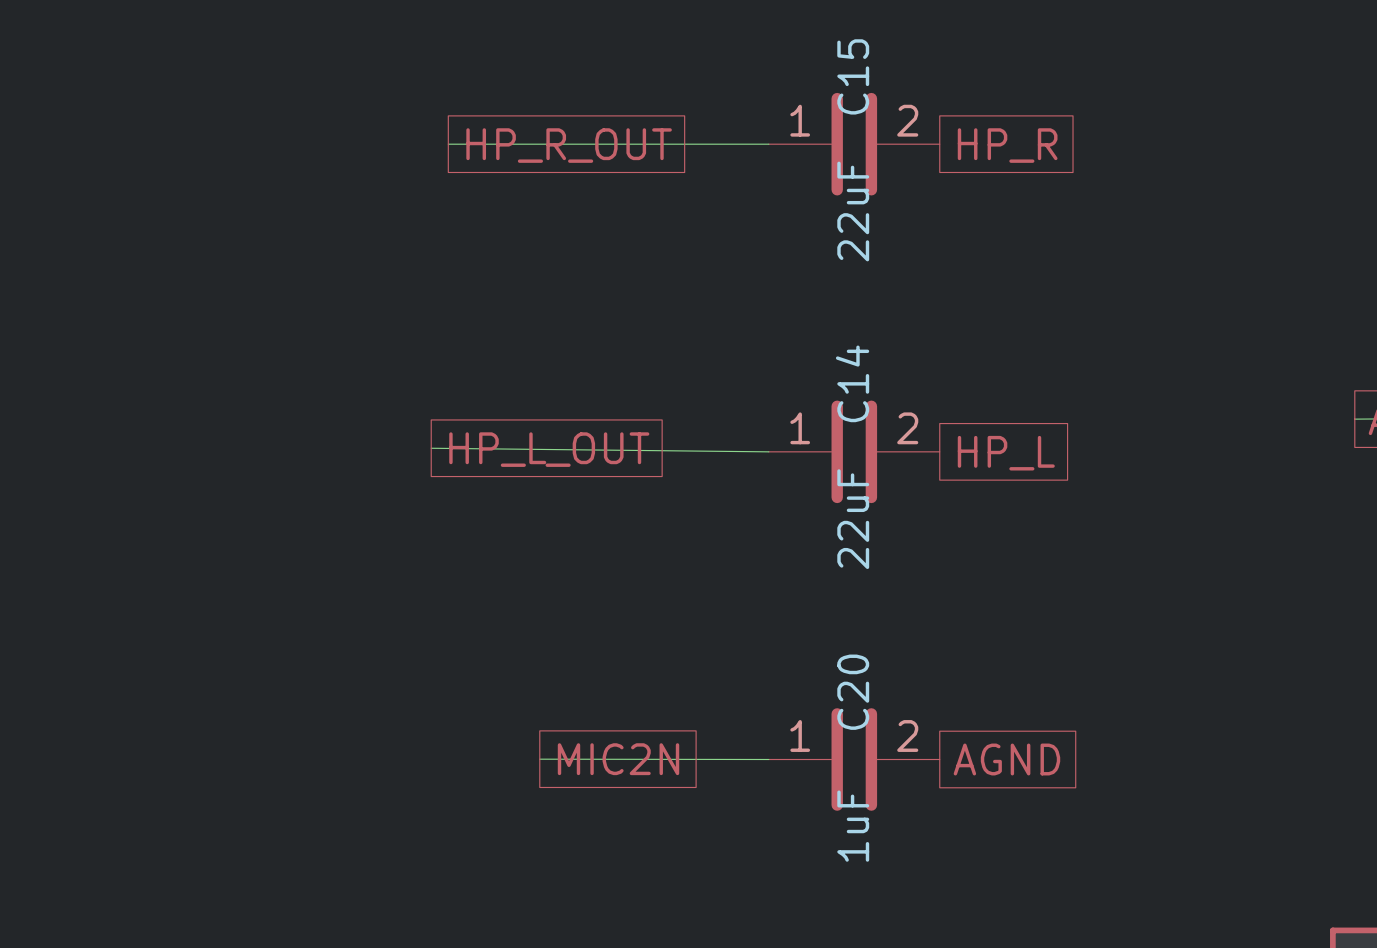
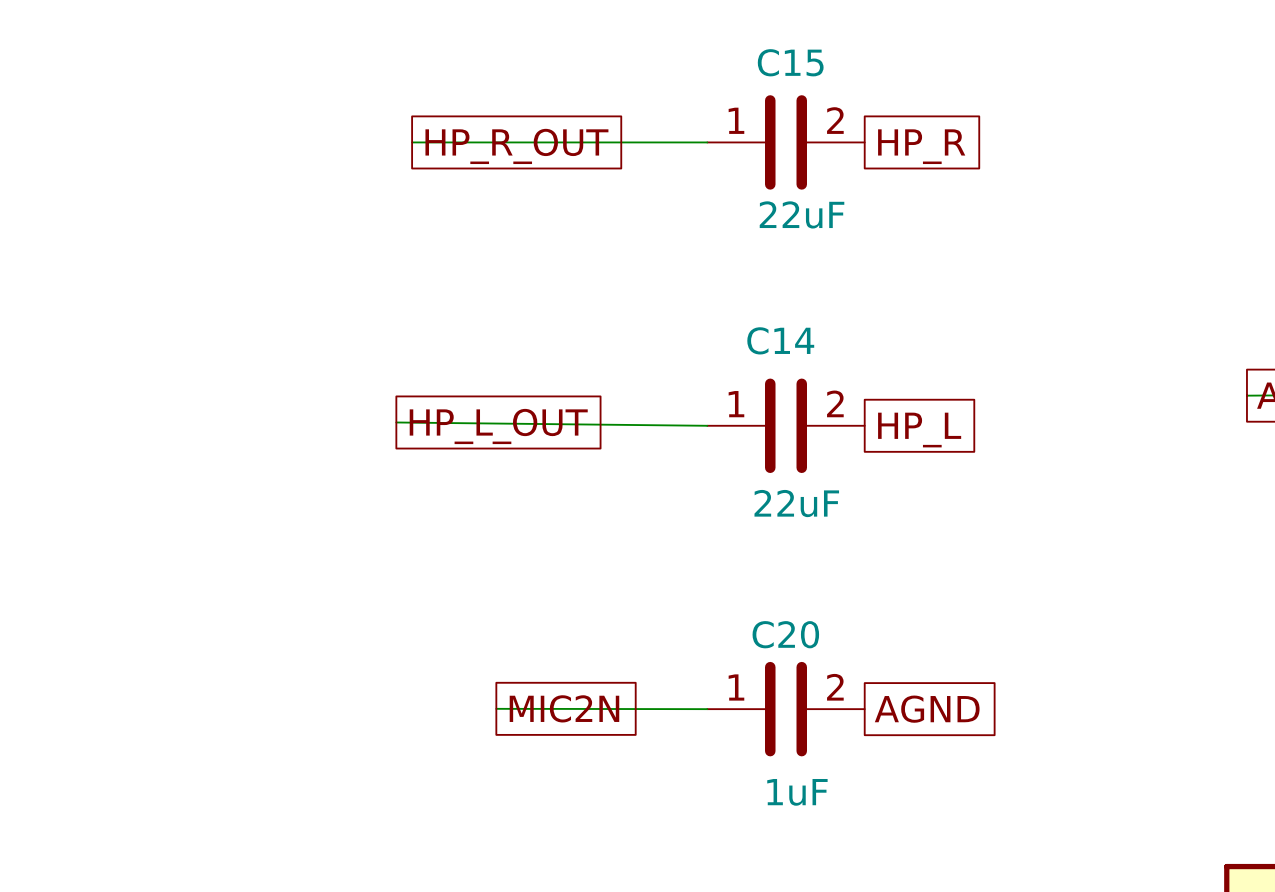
C15 name rotation: 0° (853, 76) -> 90° clockwise (790, 62)
C15 value rotation: 0° (853, 211) -> 90° clockwise (802, 214)
C14 name rotation: 0° (852, 383) -> 90° clockwise (780, 340)
C14 value rotation: 0° (853, 519) -> 90° clockwise (796, 503)
C20 name rotation: 0° (853, 692) -> 90° clockwise (785, 634)
C20 value rotation: 0° (853, 826) -> 90° clockwise (797, 792)

